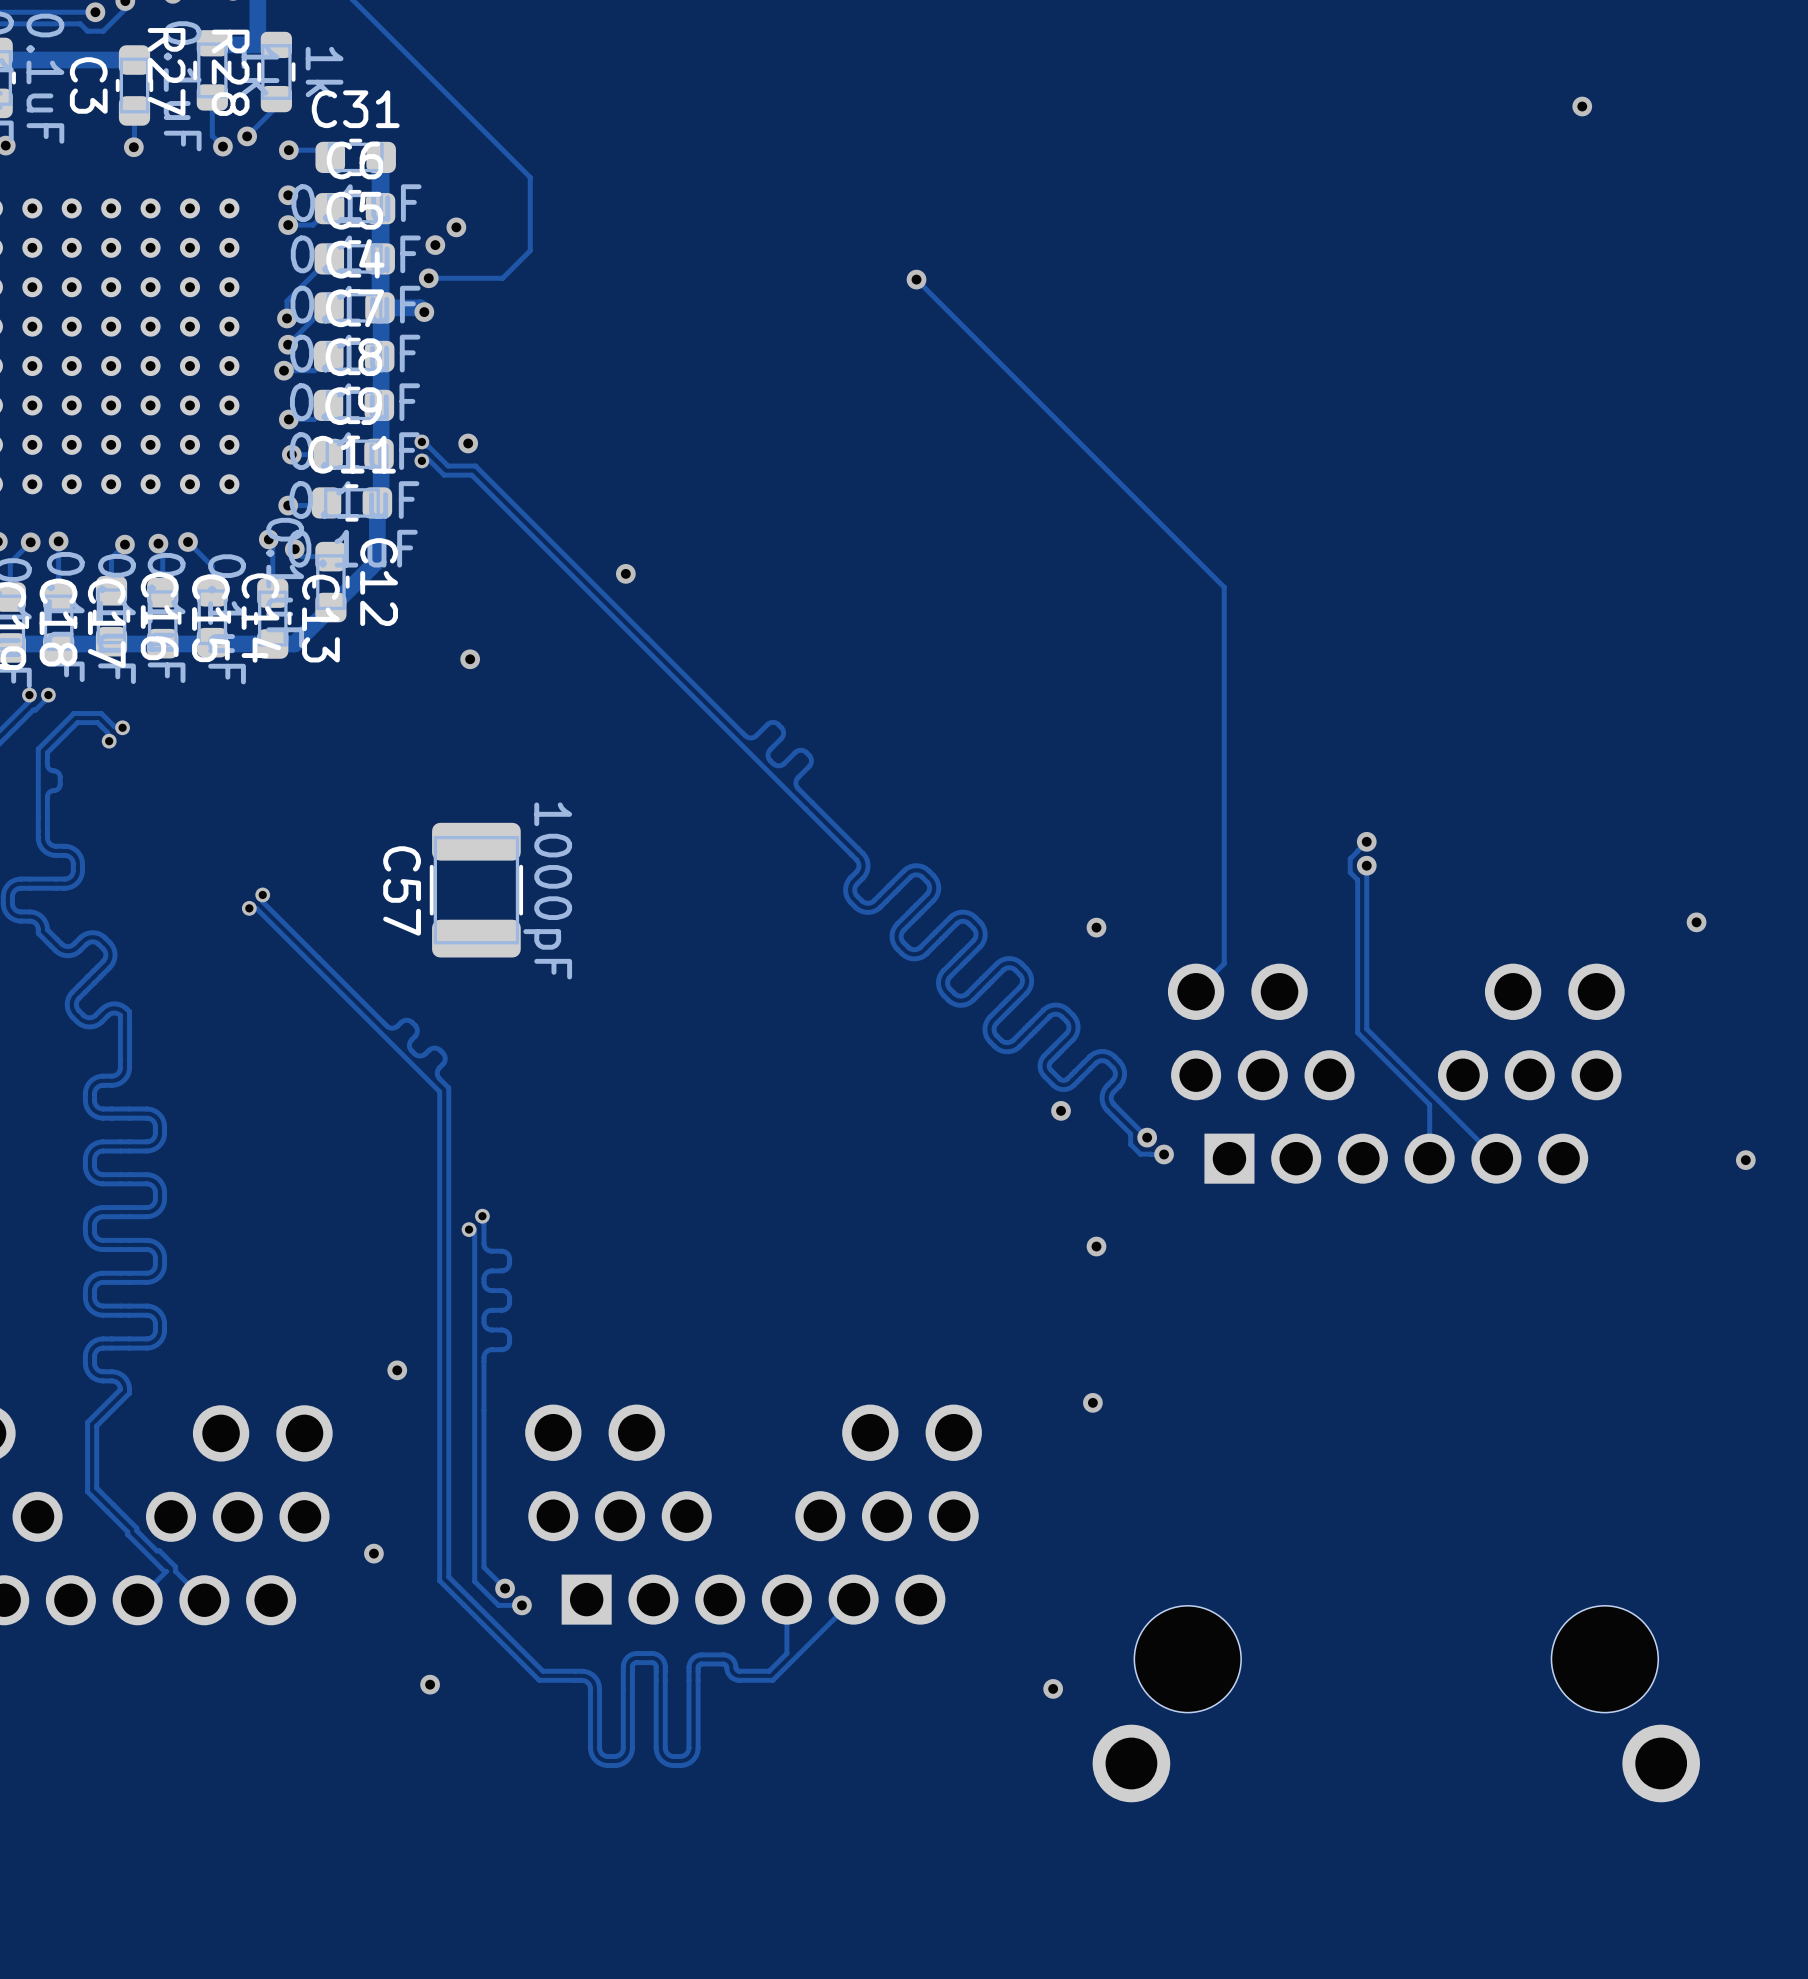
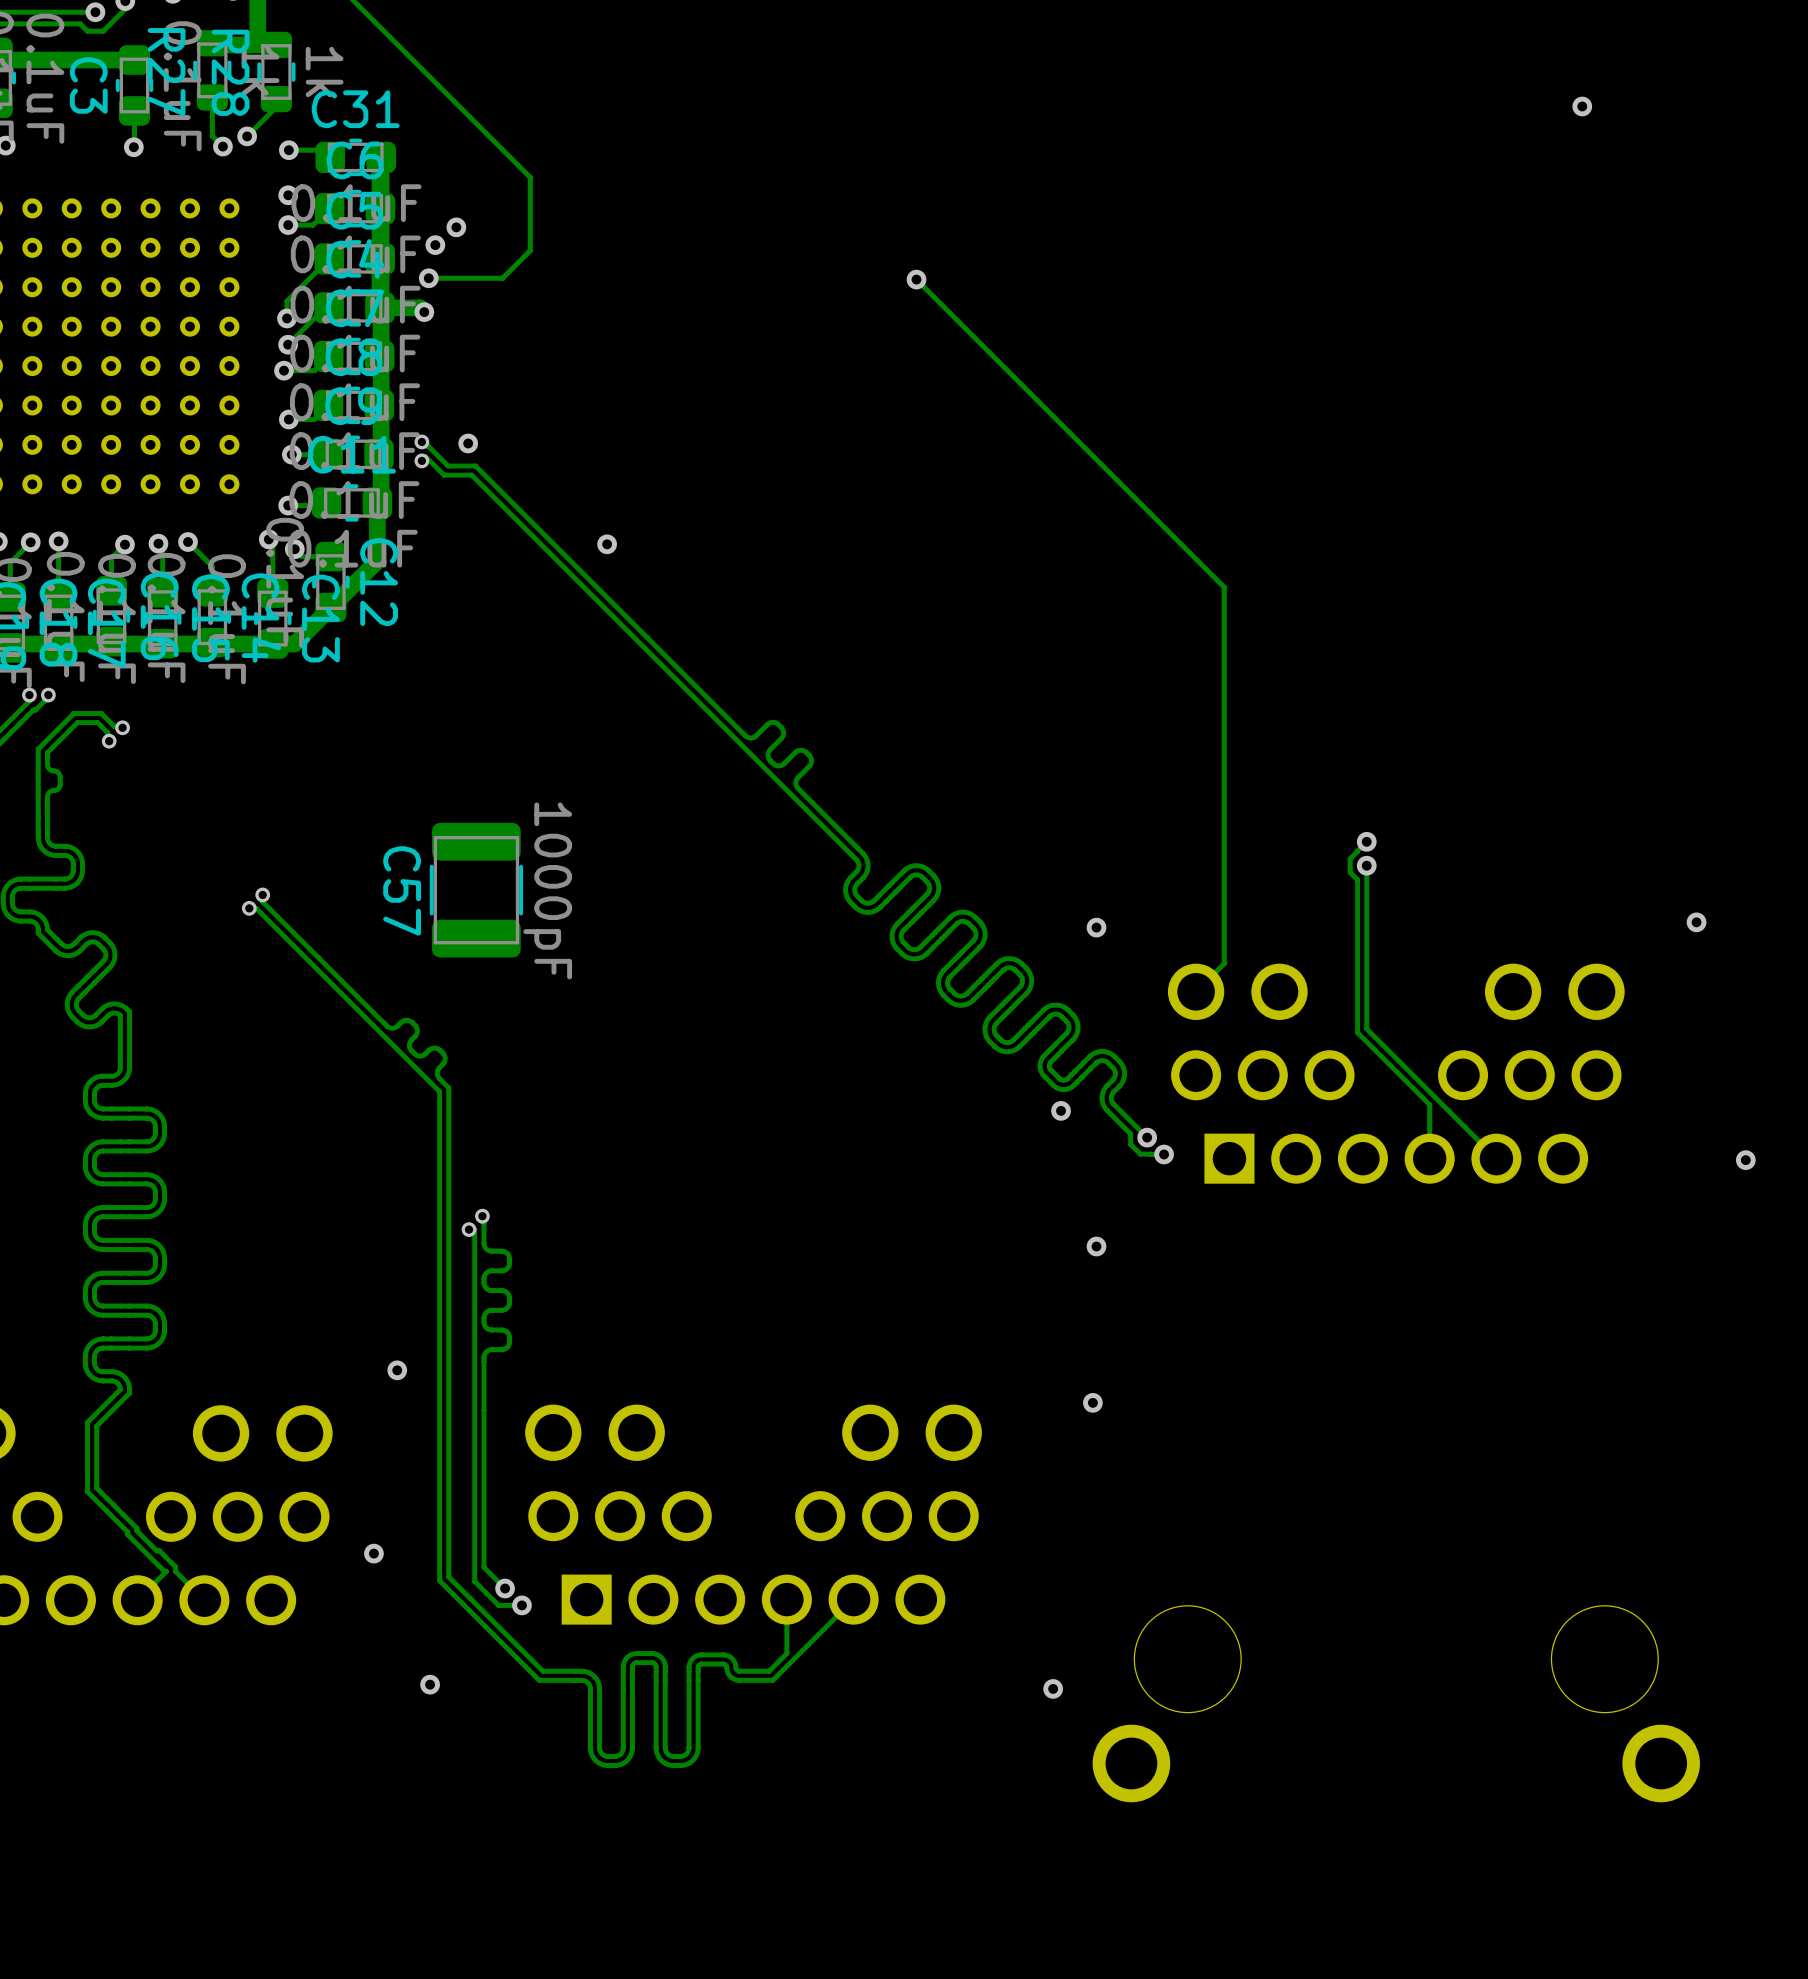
via position: (625, 573) -> (607, 544)
via: (470, 659) -> none

